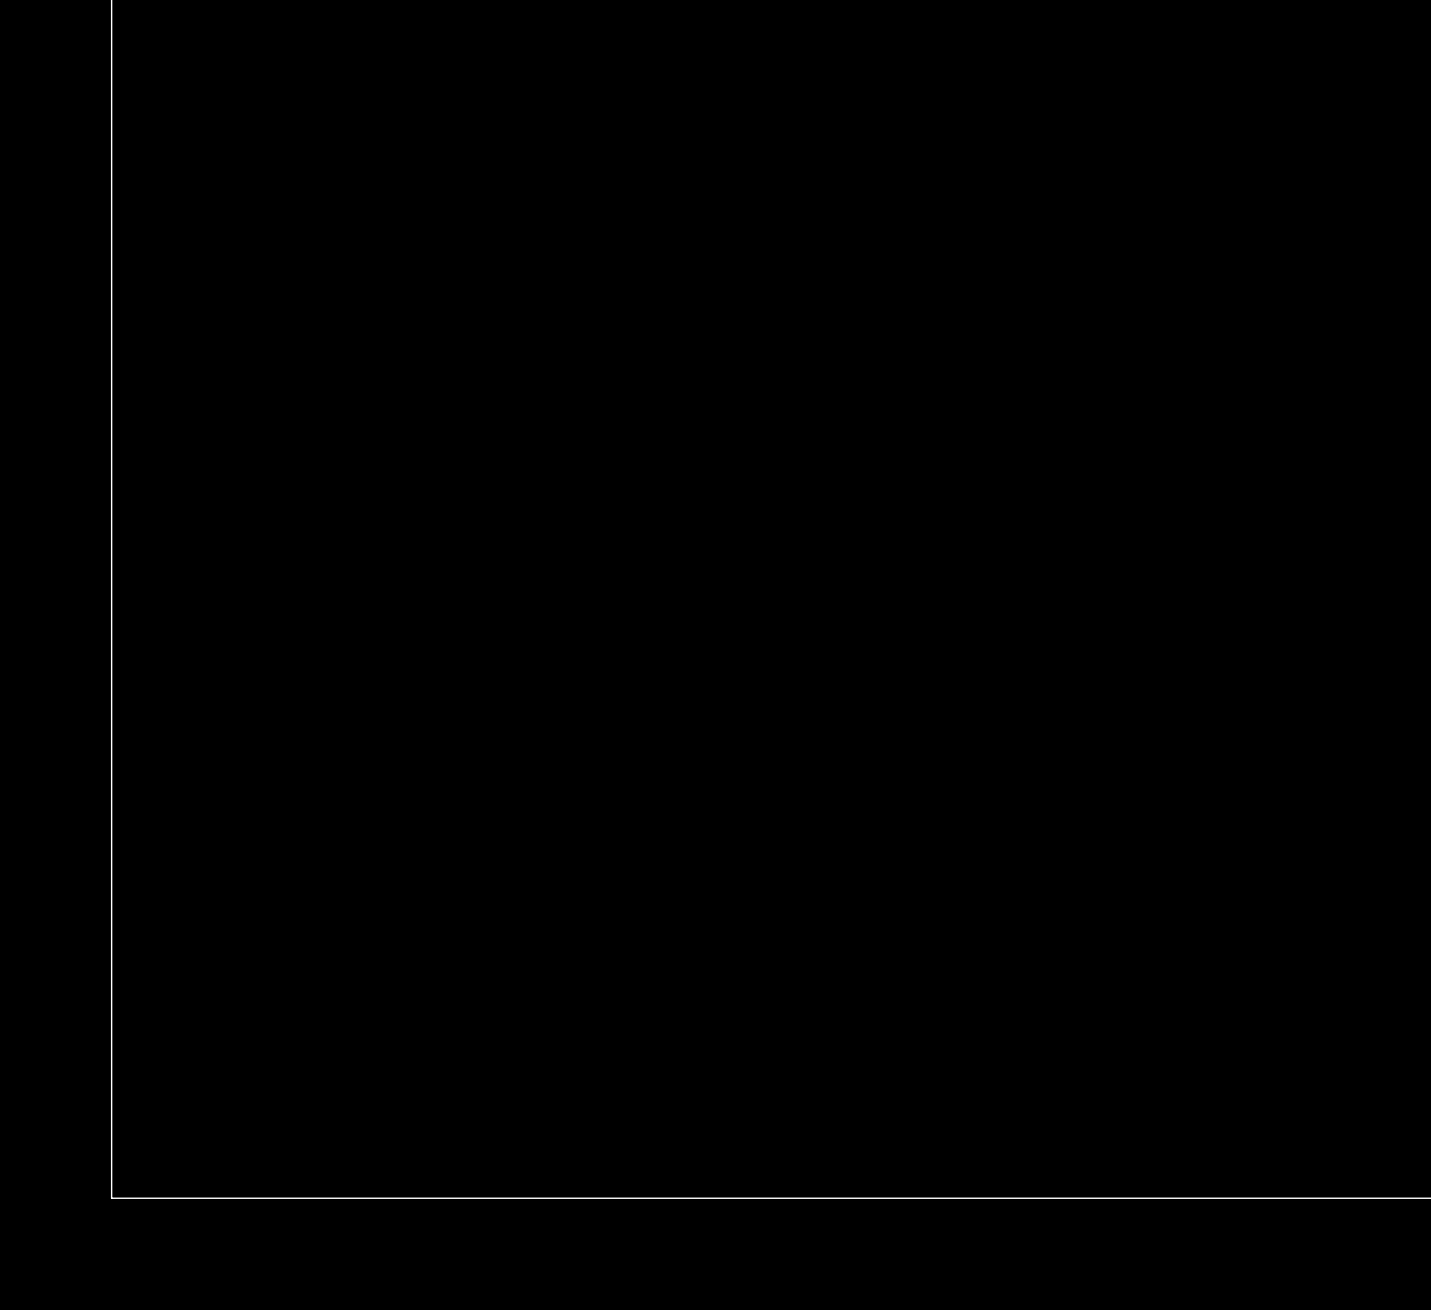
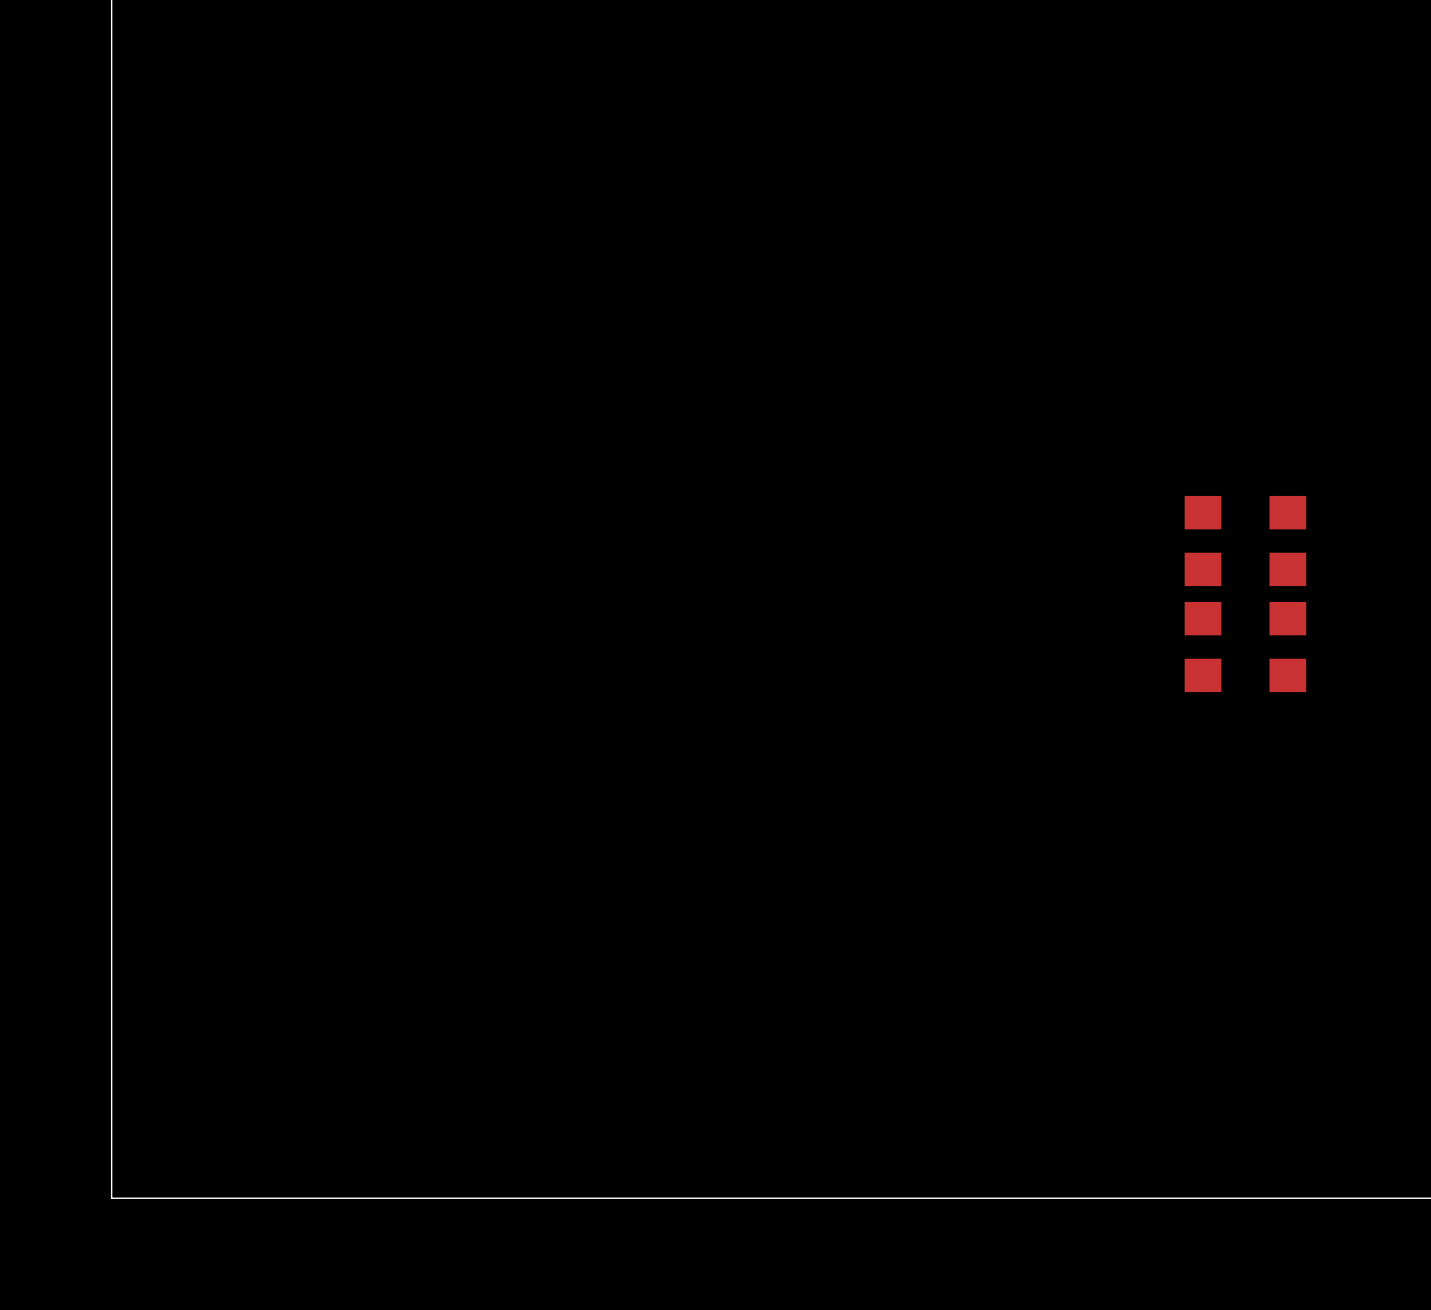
part: none -> (1203, 541)
part: none -> (1287, 541)
part: none -> (1203, 647)
part: none -> (1287, 647)

